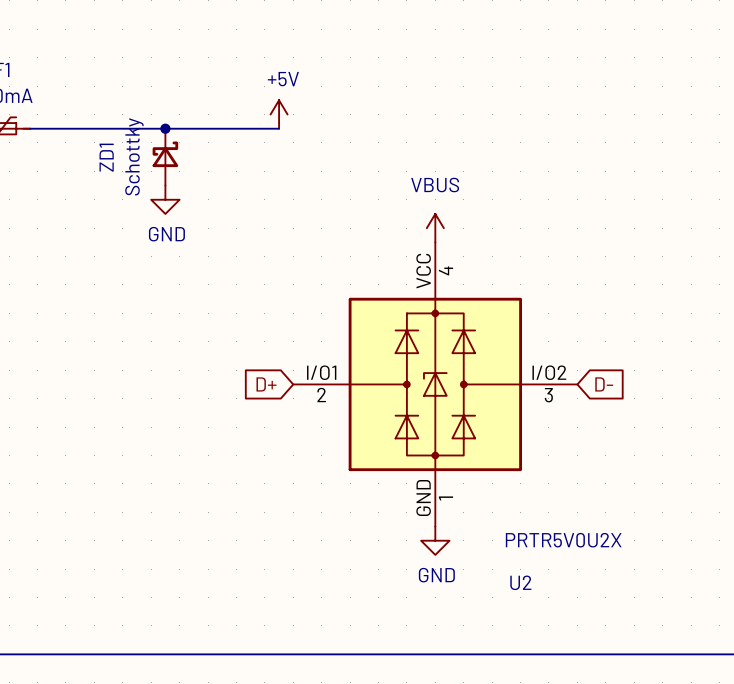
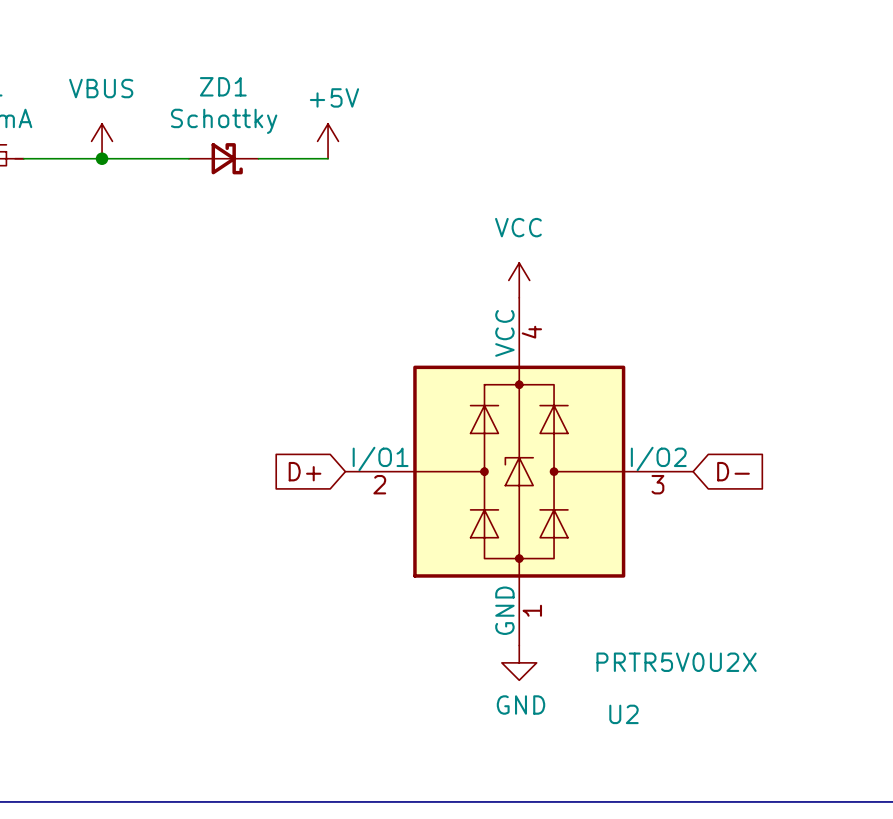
power symbol: none -> VBUS (102, 141)
junction: none -> (102, 158)
junction: (165, 128) -> none
ZD1 rotation: 0° (165, 154) -> 90° clockwise (227, 158)
ZD1 position: (165, 157) -> (223, 158)
power symbol: GND (165, 199) -> none
power symbol: VBUS (435, 228) -> VCC (519, 280)

